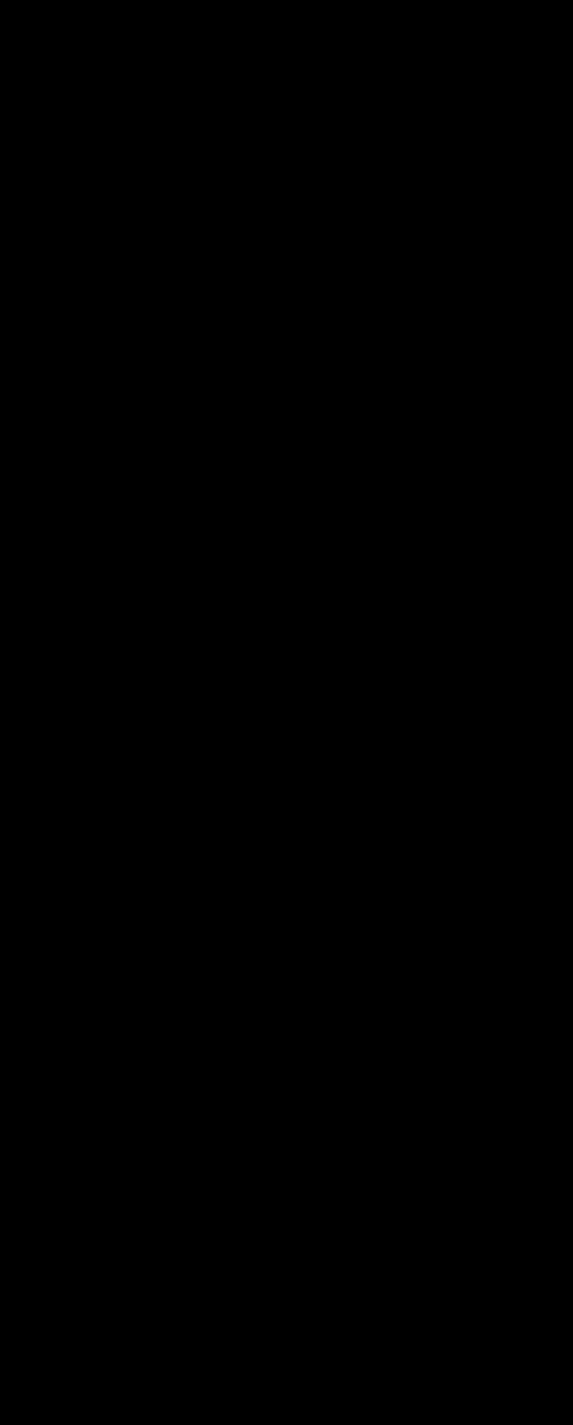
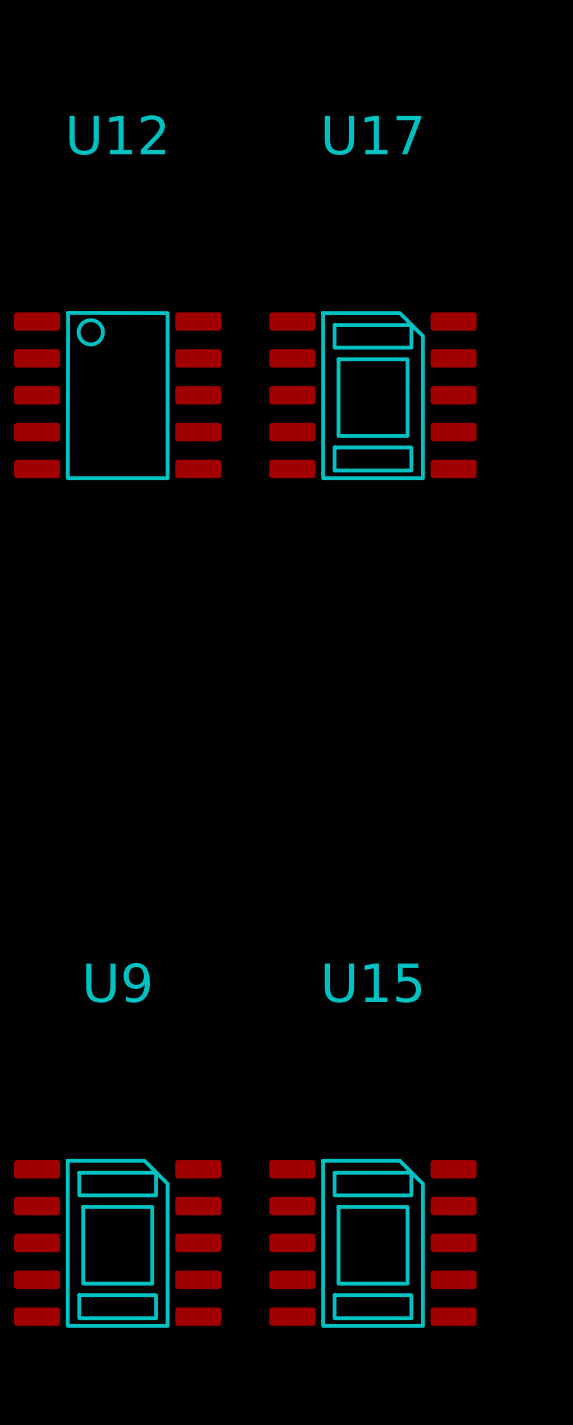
U12: none -> (117, 395)
U17: none -> (372, 395)
U9: none -> (117, 1243)
U15: none -> (372, 1243)

